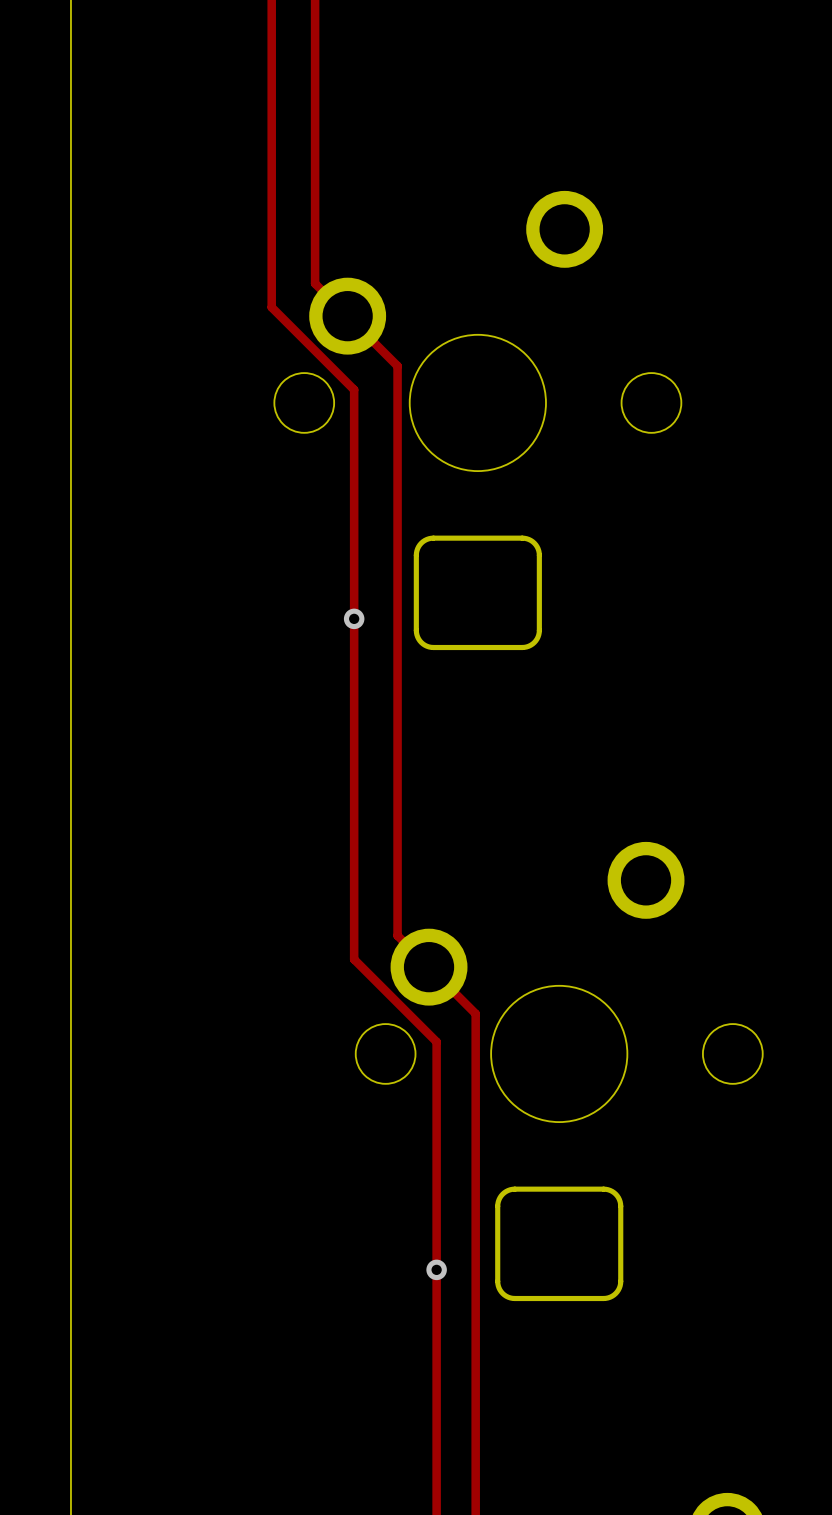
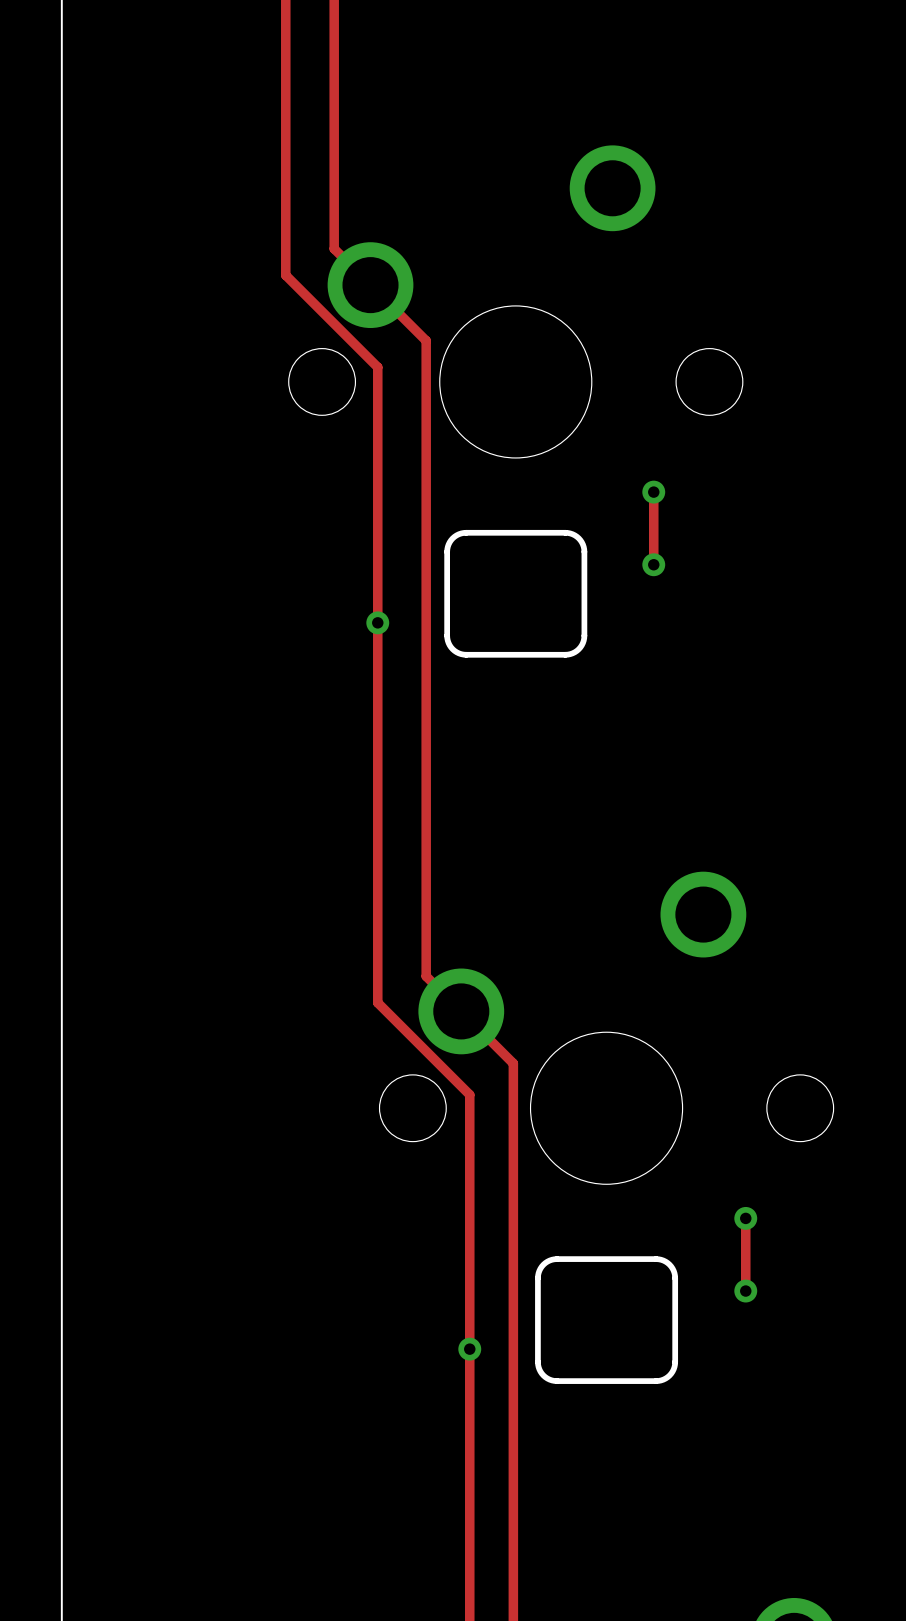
track: none -> (653, 492) (653, 564)
via: none -> (653, 492)
via: none -> (653, 564)
track: none -> (745, 1218) (745, 1291)
via: none -> (745, 1218)
via: none -> (745, 1291)

